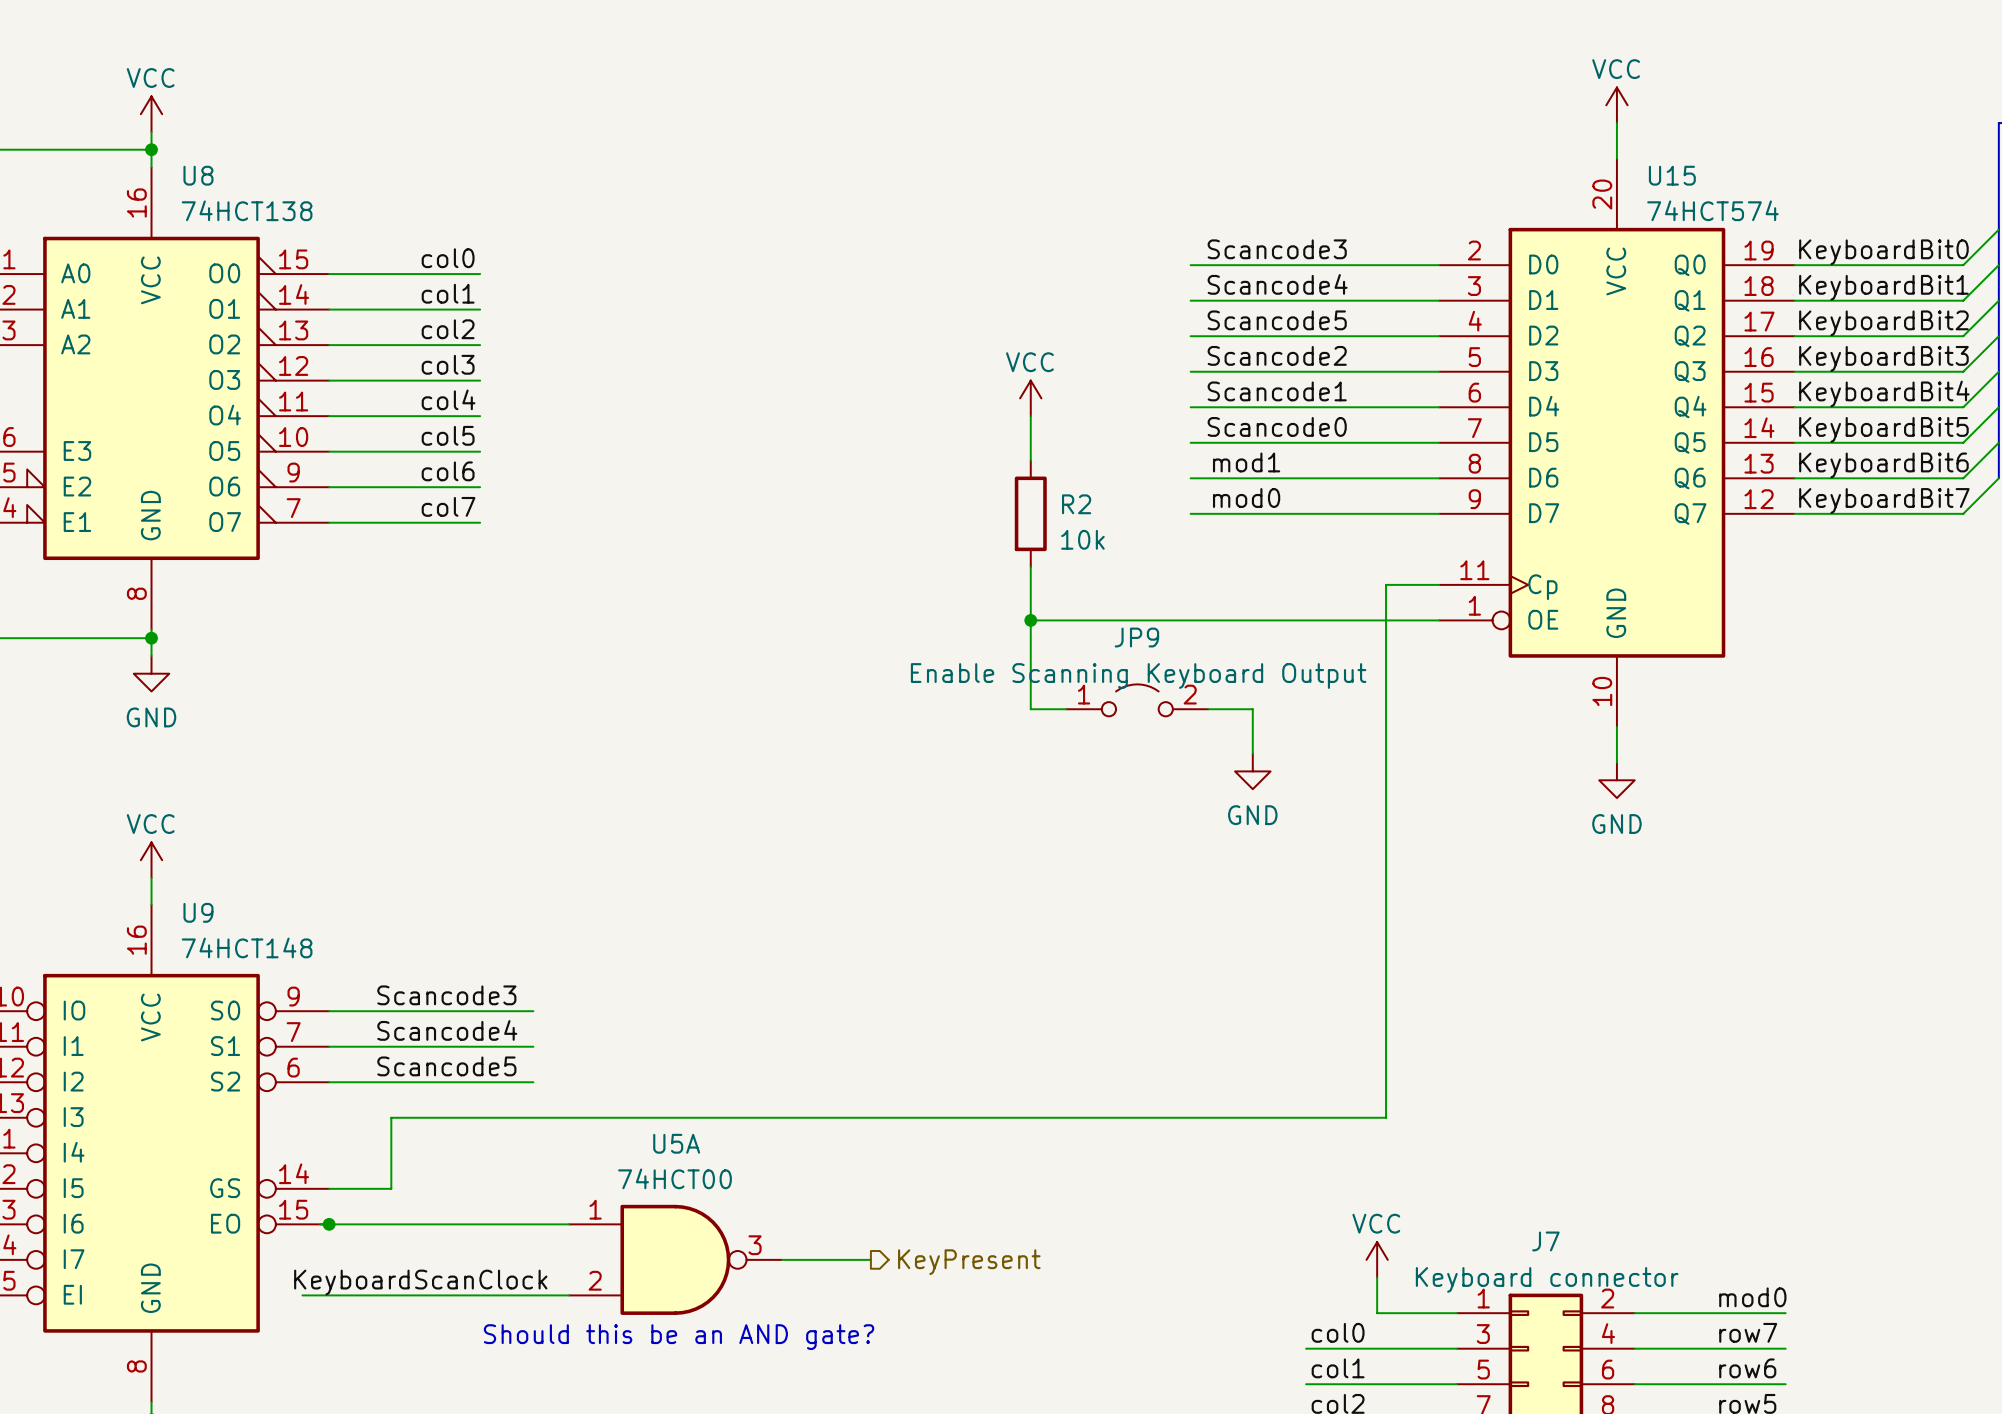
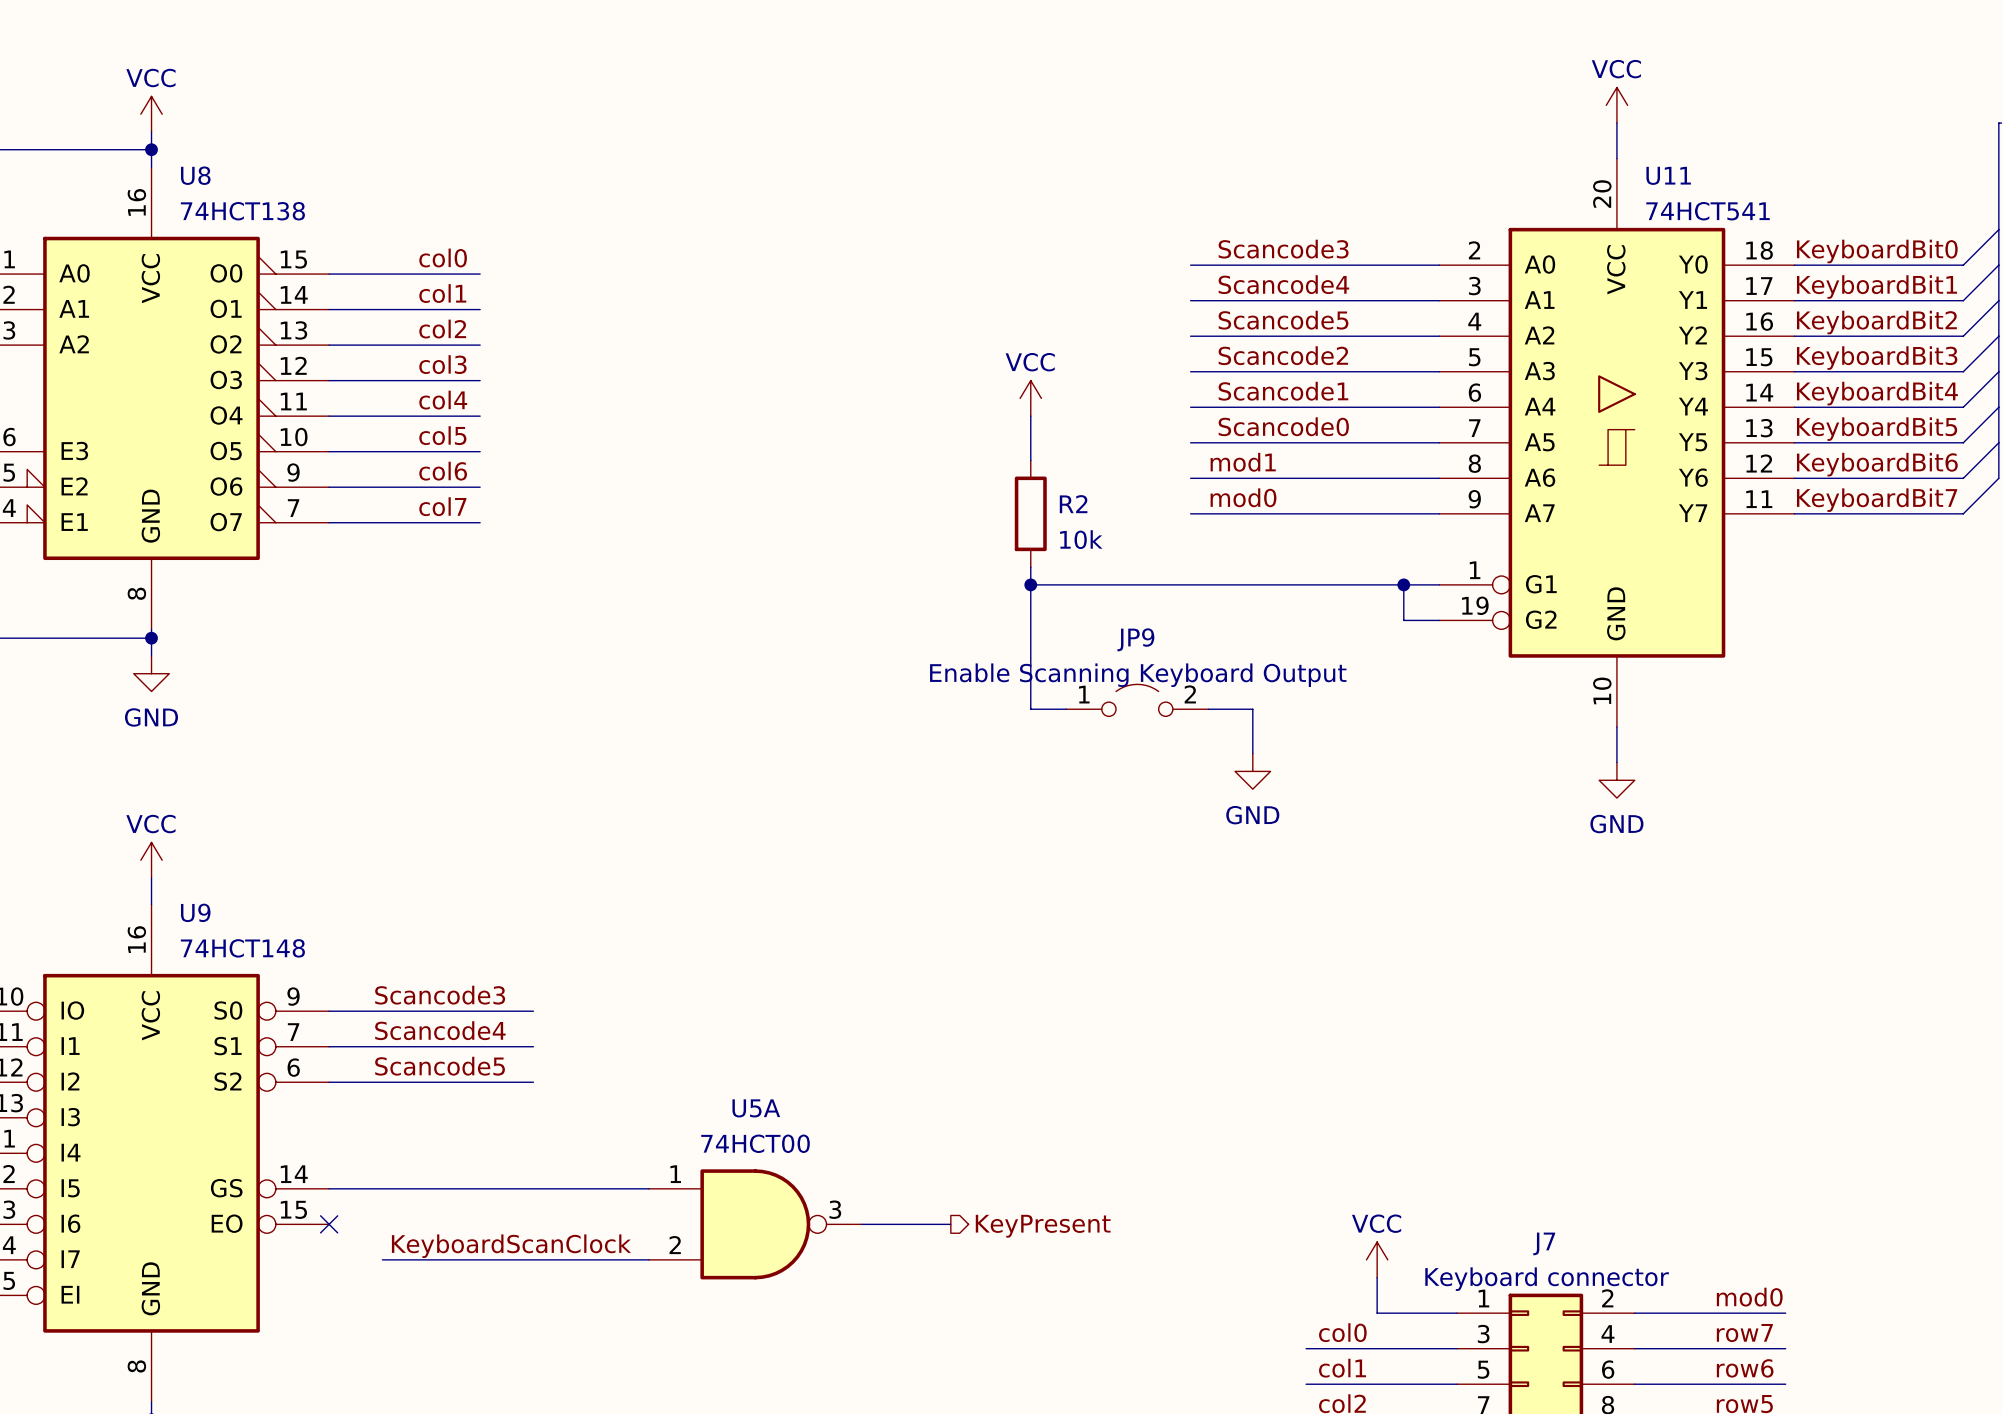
U15: 74HCT574 (1616, 442) -> none
U11: none -> 74HCT541 (1616, 442)
wire: (1386, 584) (1386, 1117) (391, 1117) (391, 1188) -> (1386, 584) (1030, 584)
junction: none -> (1403, 584)
wire: (1030, 620) (1403, 620) -> (1403, 584) (1403, 620)
junction position: (1030, 620) -> (1030, 584)
wire: none -> (391, 1188) (648, 1188)
wire: (320, 1224) (568, 1224) -> none
junction: (329, 1224) -> none
no-connect mark: none -> (329, 1224)
U5A position: (675, 1259) -> (755, 1224)
wire: (782, 1259) (870, 1259) -> (862, 1224) (950, 1224)
hierarchical label position: KeyPresent (969, 1262) -> KeyPresent (1043, 1226)
label position: KeyboardScanClock (420, 1282) -> KeyboardScanClock (511, 1246)
wire: (302, 1295) (568, 1295) -> (382, 1259) (648, 1259)
text: Should this be an AND gate? (679, 1337) -> none

